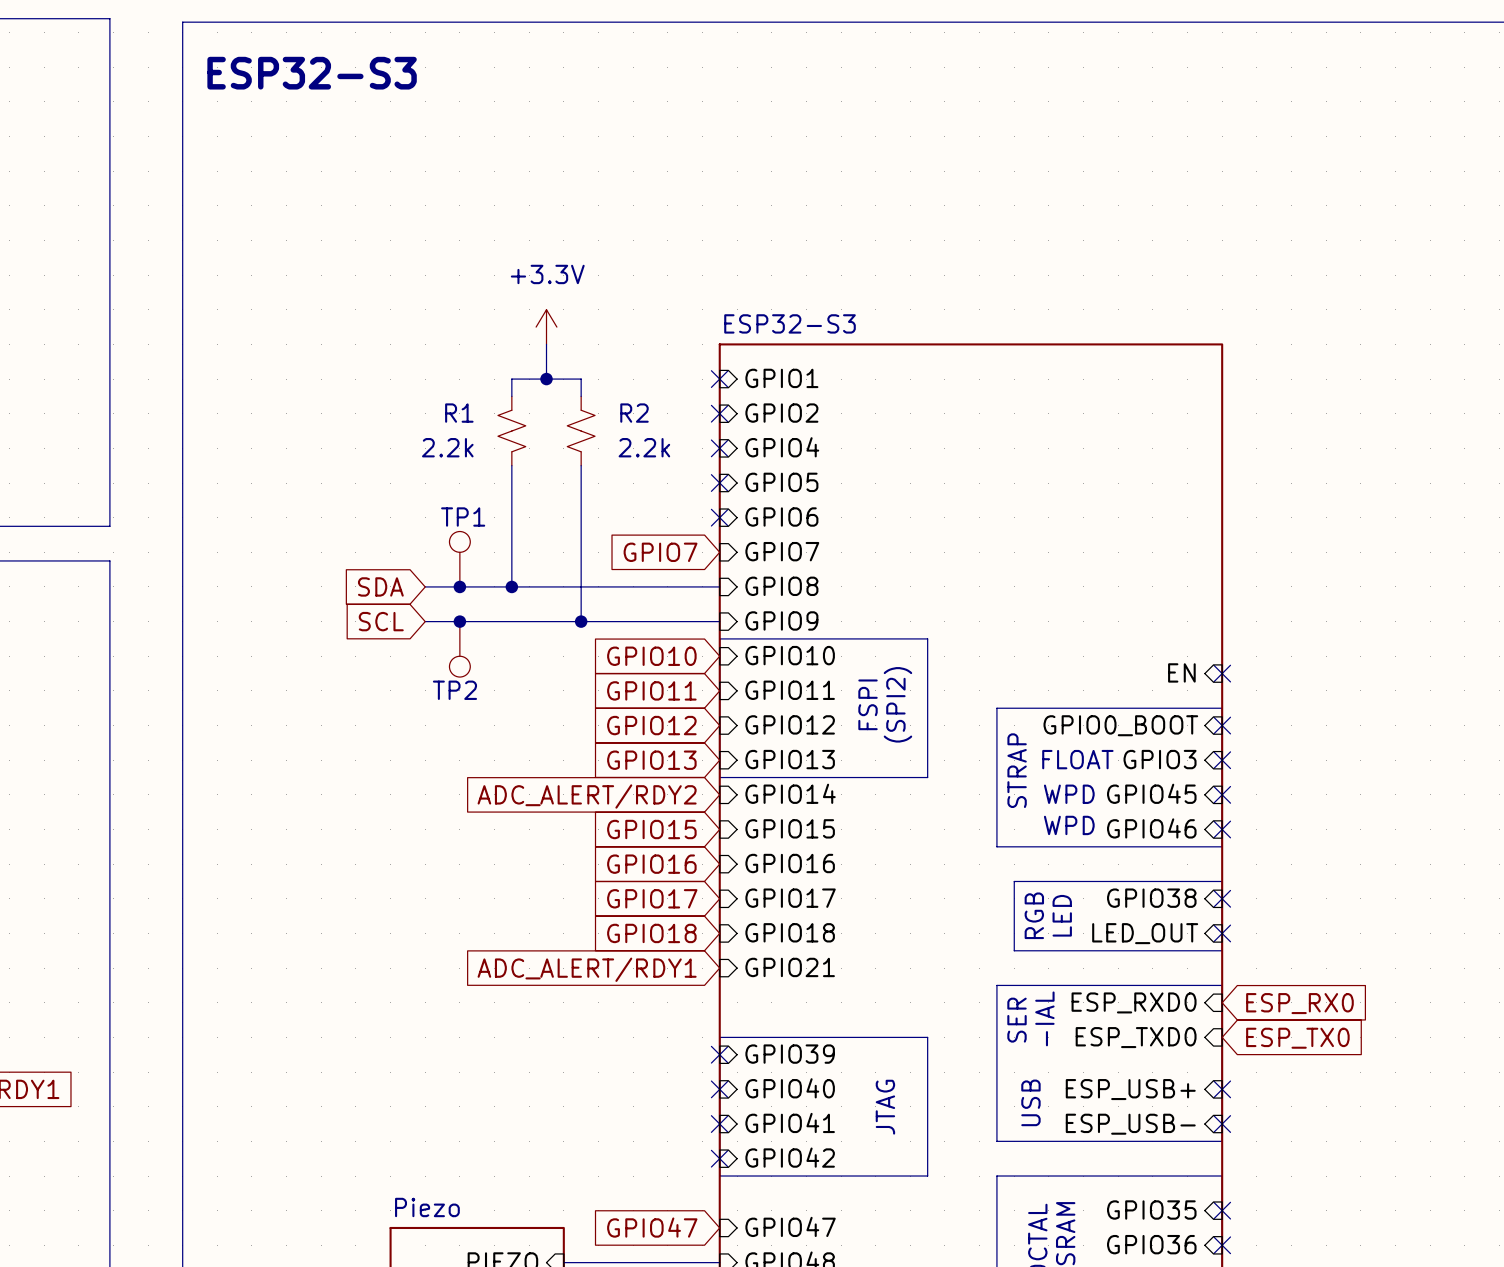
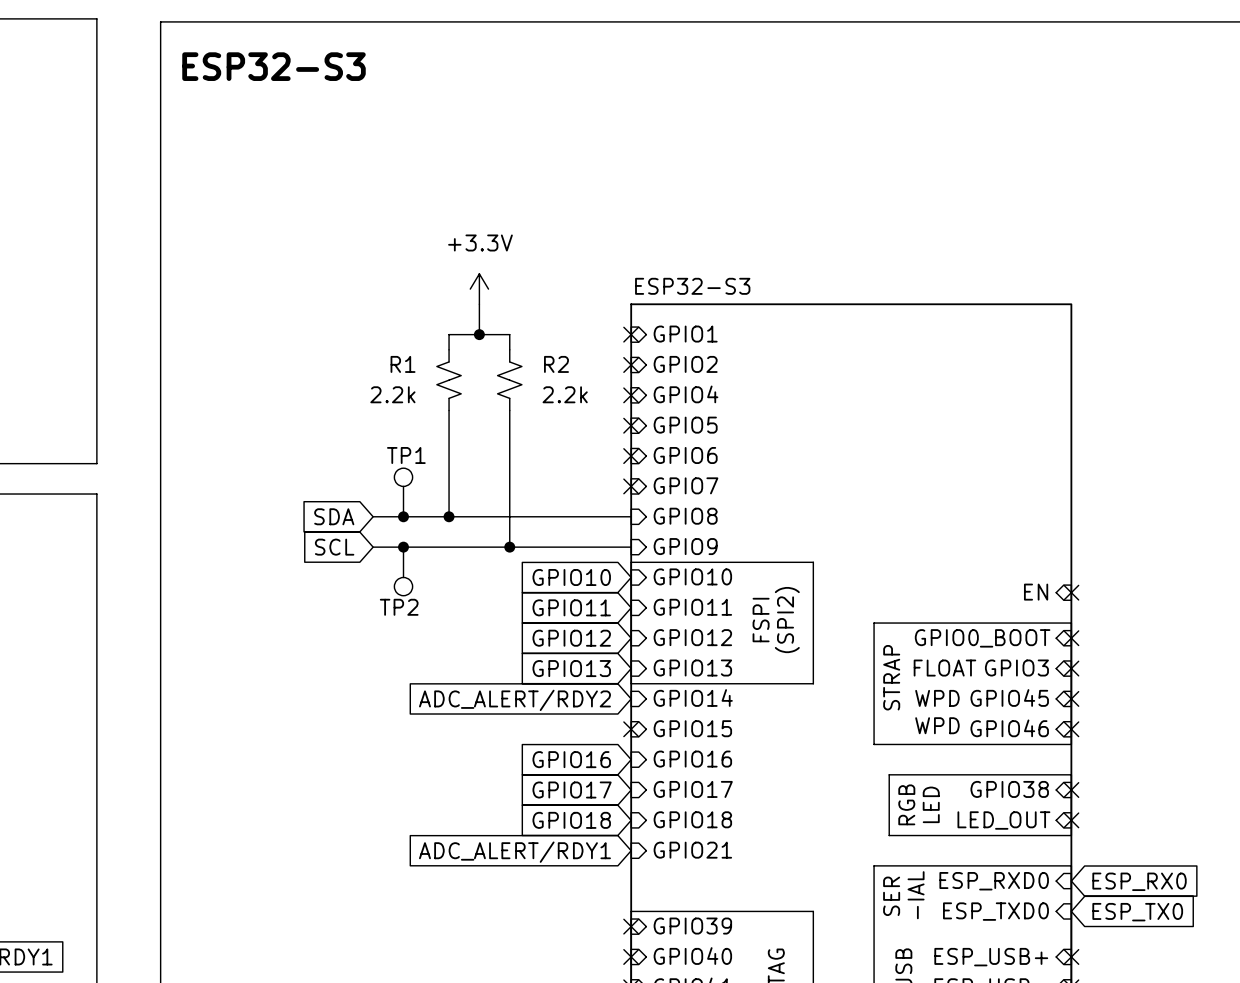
global label: GPIO7 (660, 552) -> none
no-connect mark: none -> (631, 486)
global label: GPIO15 (651, 829) -> none
no-connect mark: none -> (631, 729)

